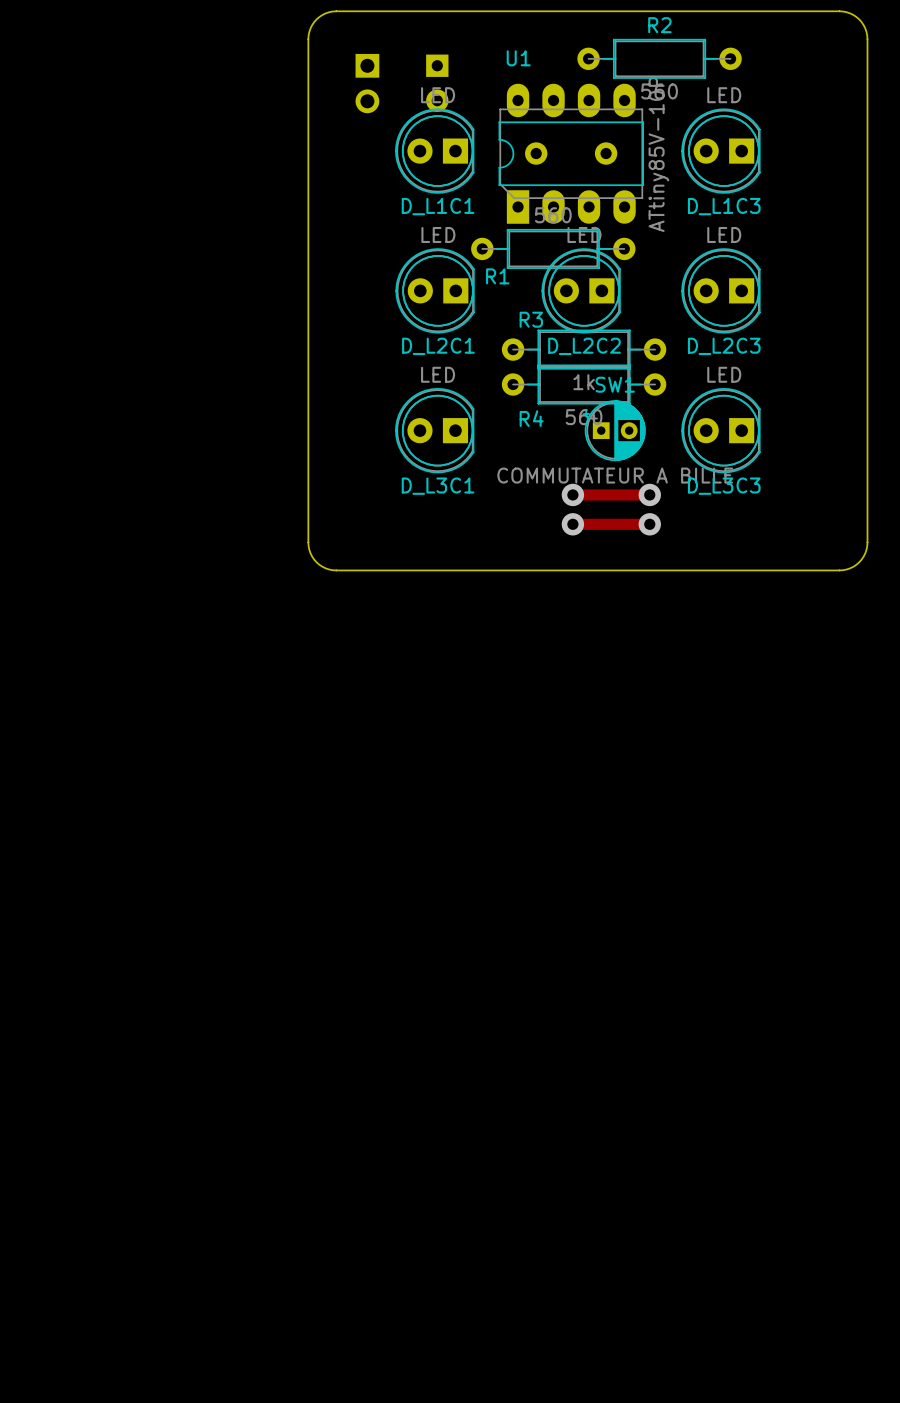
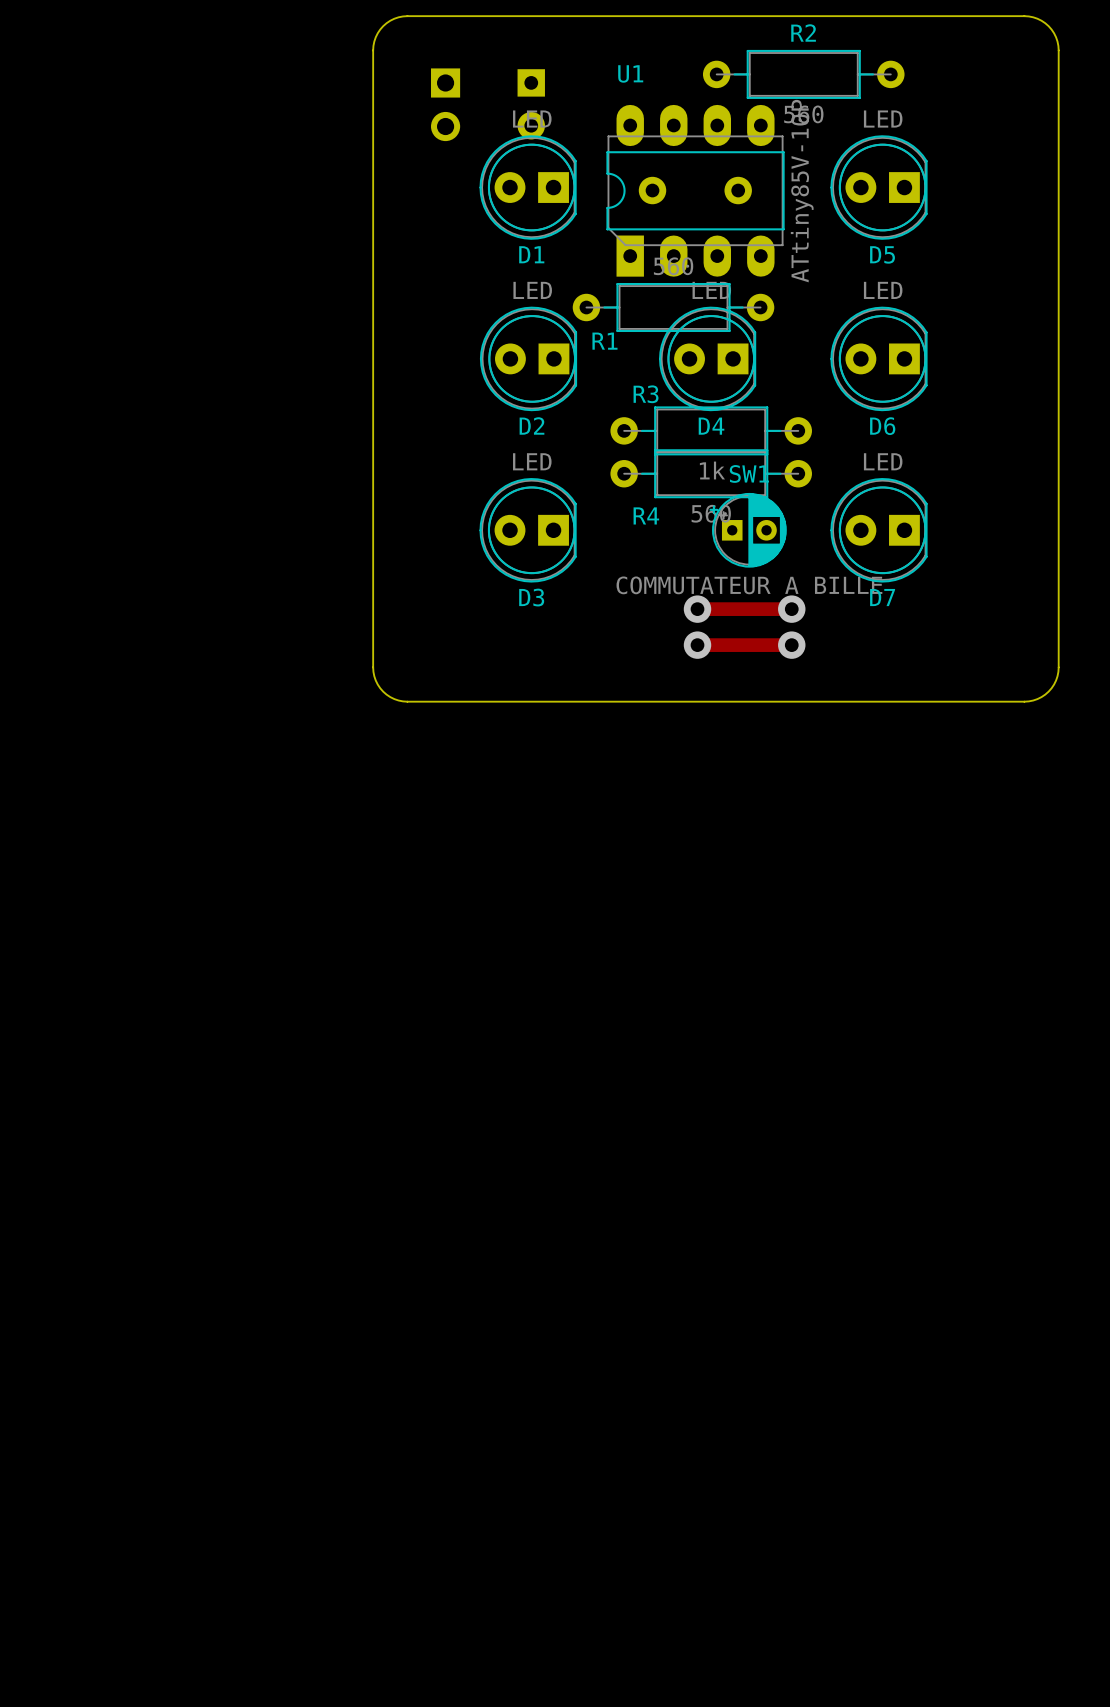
D_L1C1 name: D_L1C1 (438, 206) -> D1 (531, 254)
D_L1C3 name: D_L1C3 (724, 206) -> D5 (882, 254)
D_L2C1 name: D_L2C1 (438, 346) -> D2 (531, 425)
D_L2C2 name: D_L2C2 (584, 346) -> D4 (711, 426)
D_L2C3 name: D_L2C3 (724, 346) -> D6 (882, 426)
D_L3C1 name: D_L3C1 (438, 486) -> D3 (531, 597)
D_L3C3 name: D_L3C3 (724, 486) -> D7 (882, 597)

